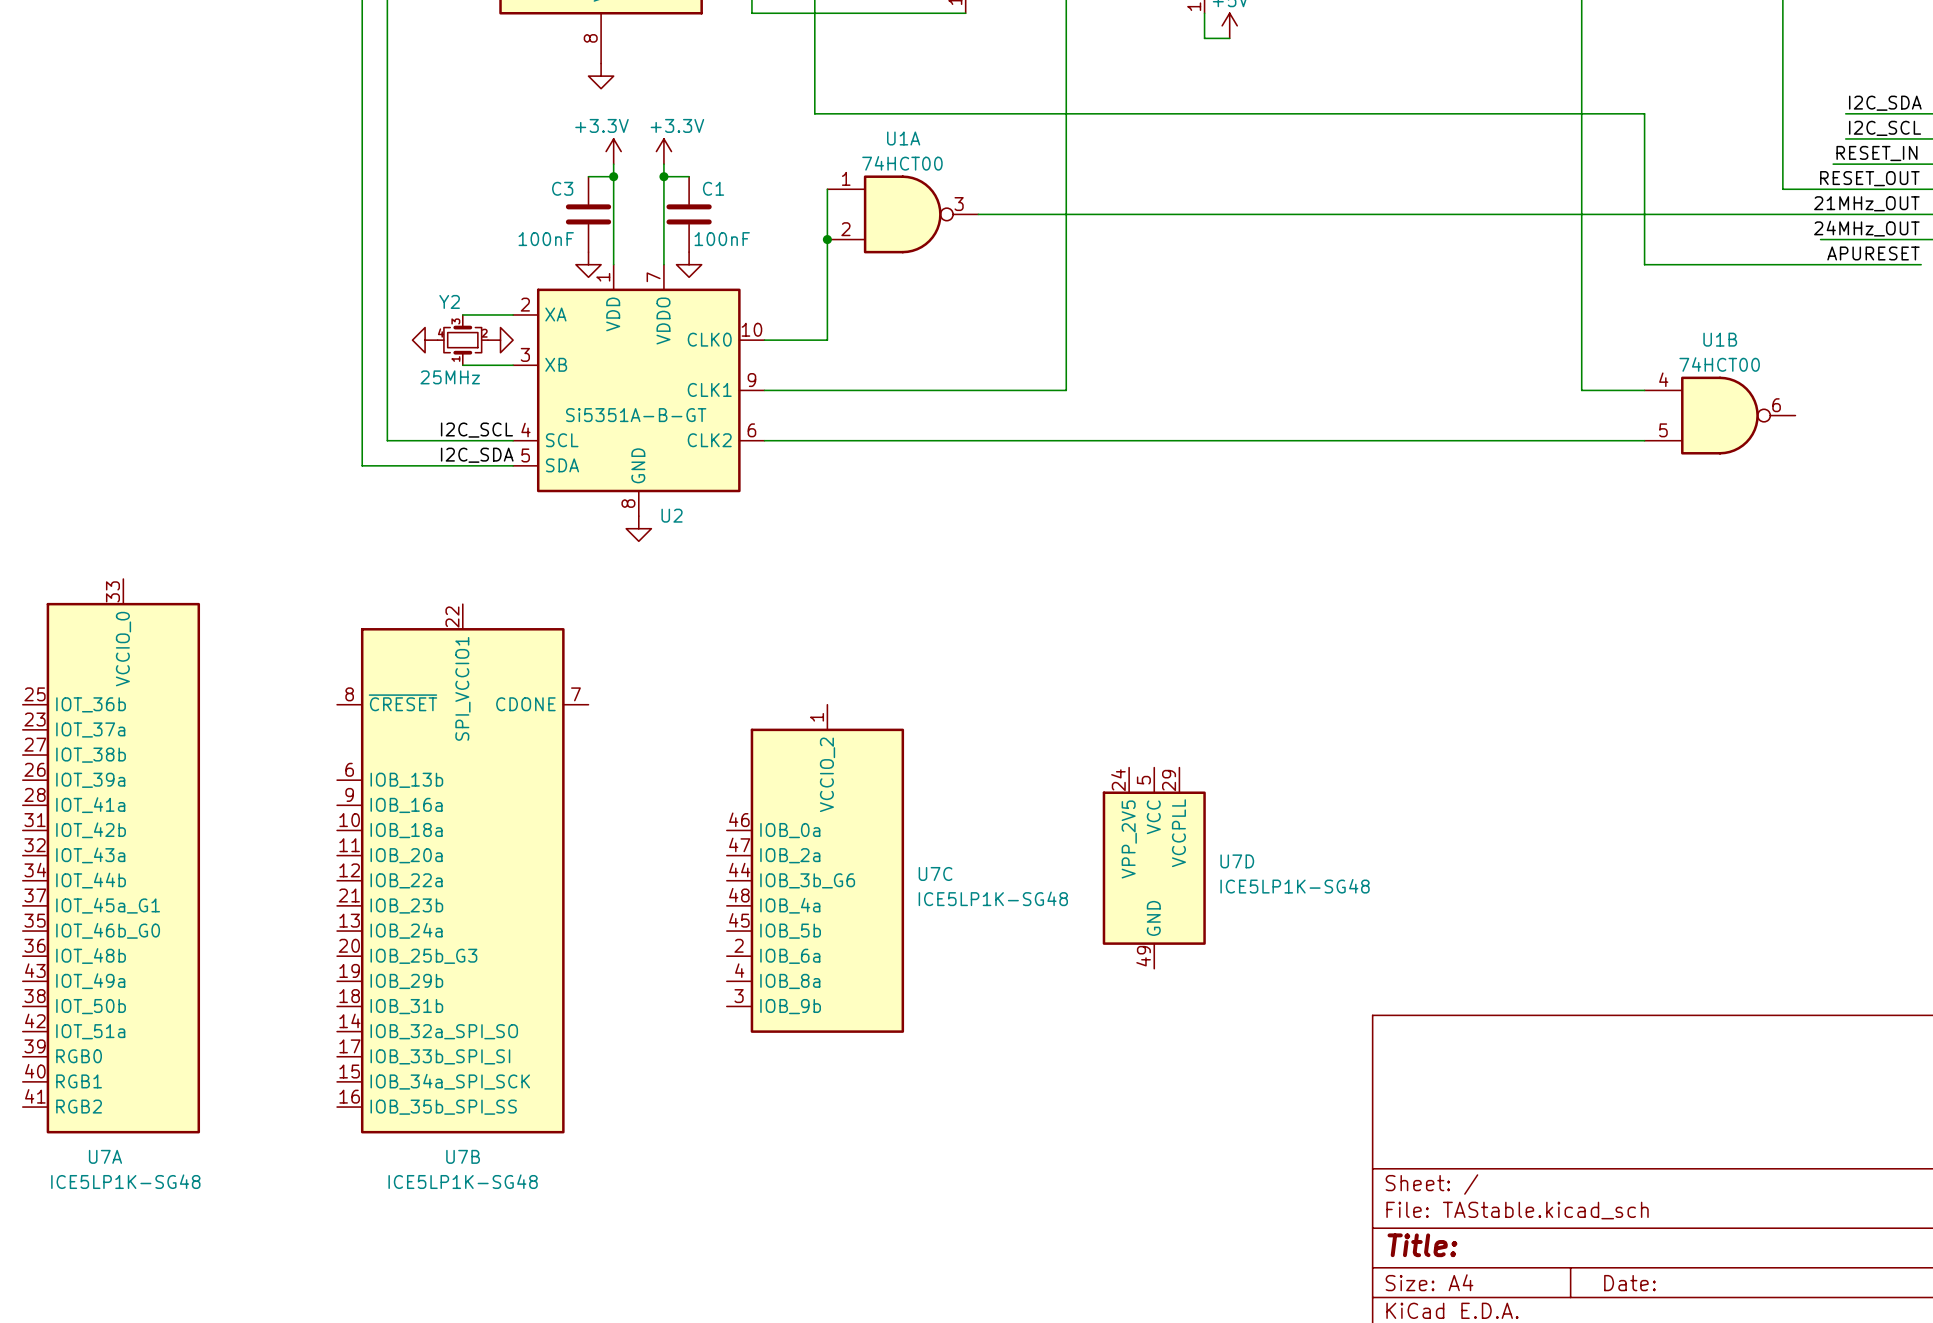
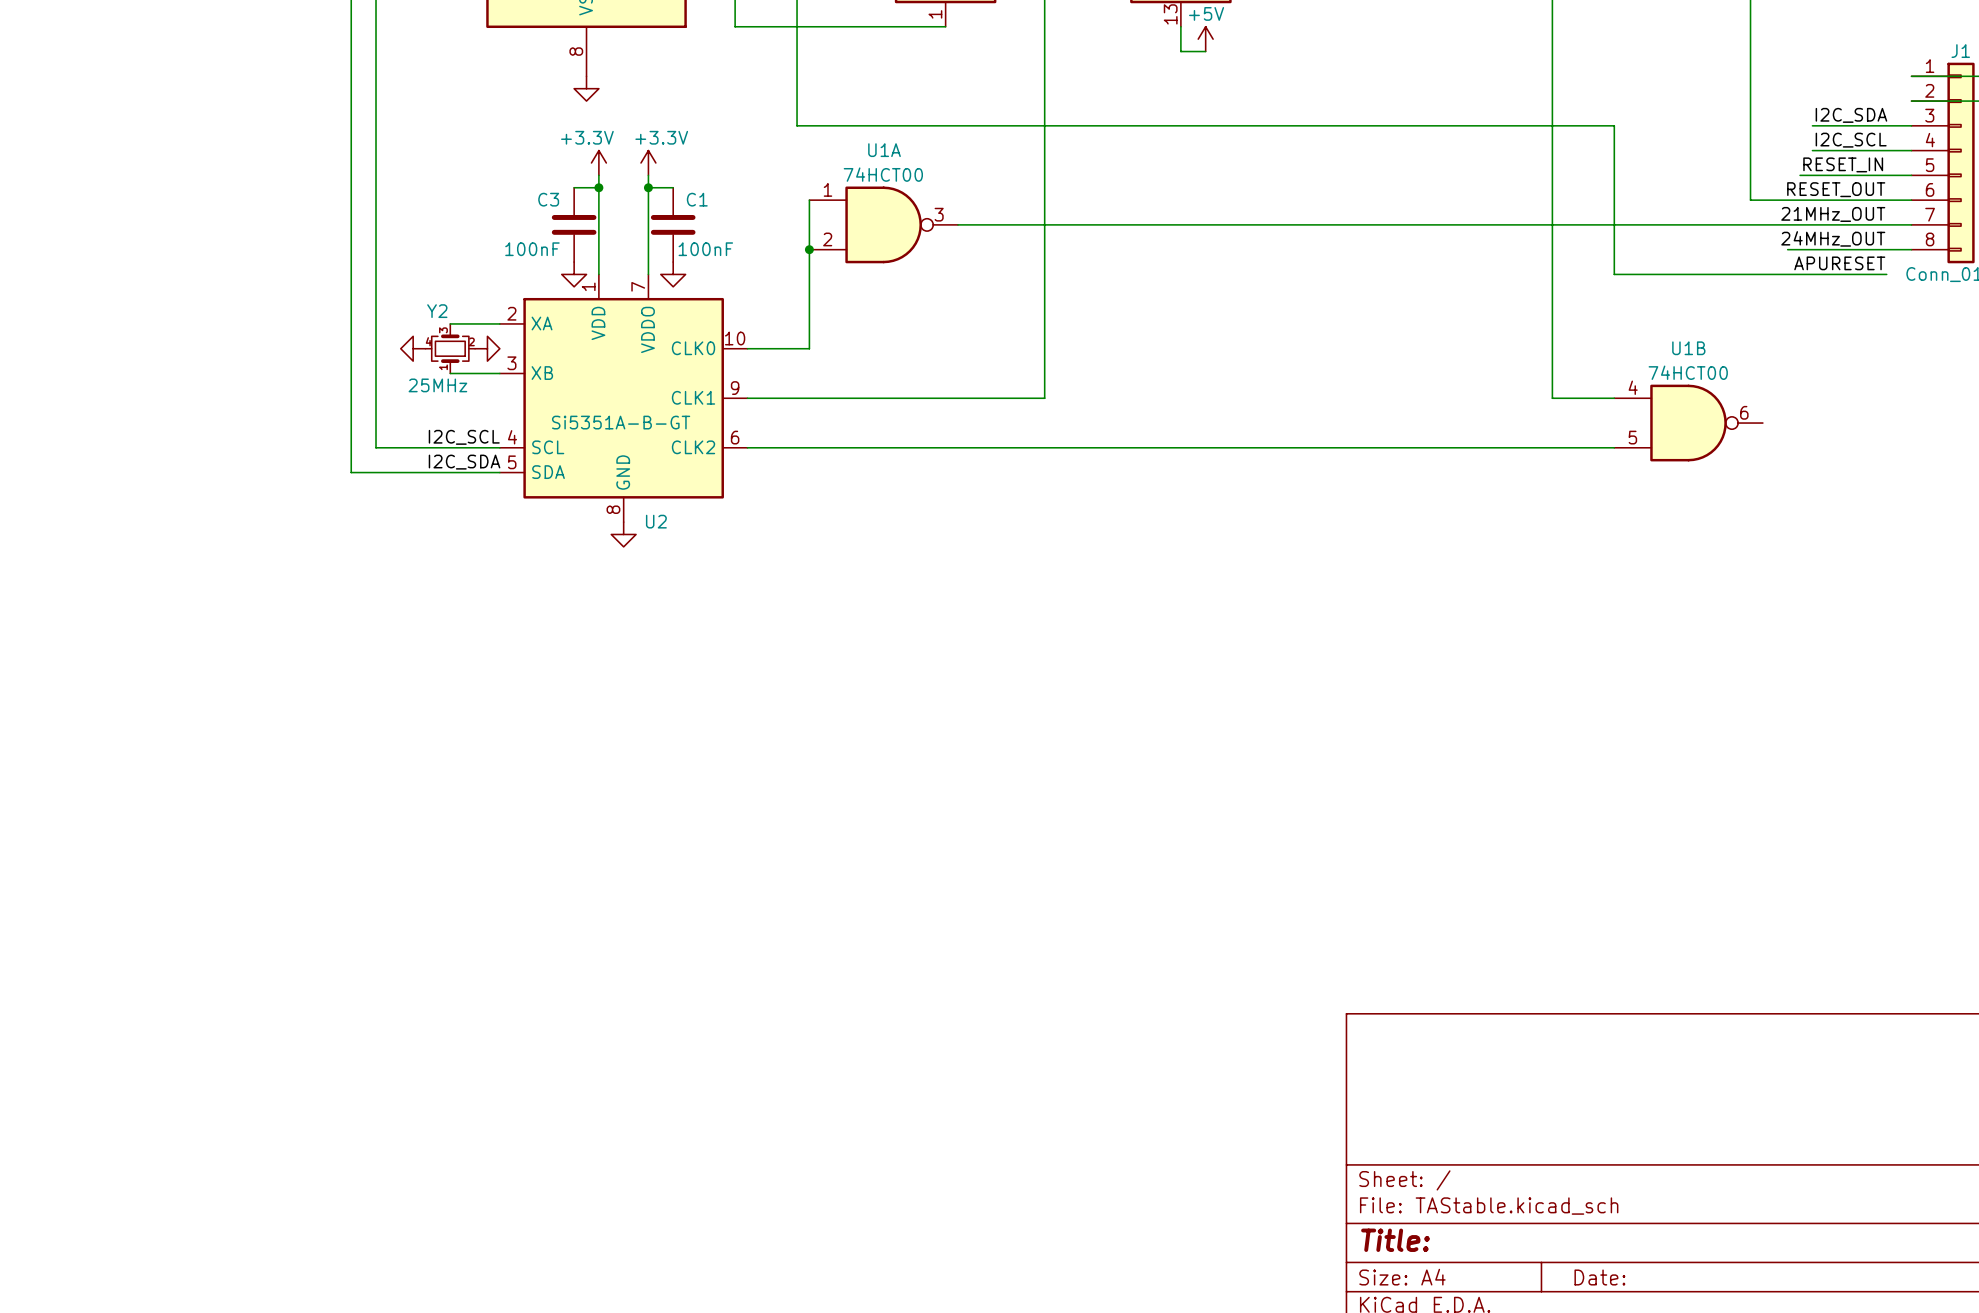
U7A: ICE5LP1K-SG48 (111, 856) -> none
U7B: ICE5LP1K-SG48 (462, 868) -> none
U7C: ICE5LP1K-SG48 (815, 868) -> none
U7D: ICE5LP1K-SG48 (1154, 868) -> none

